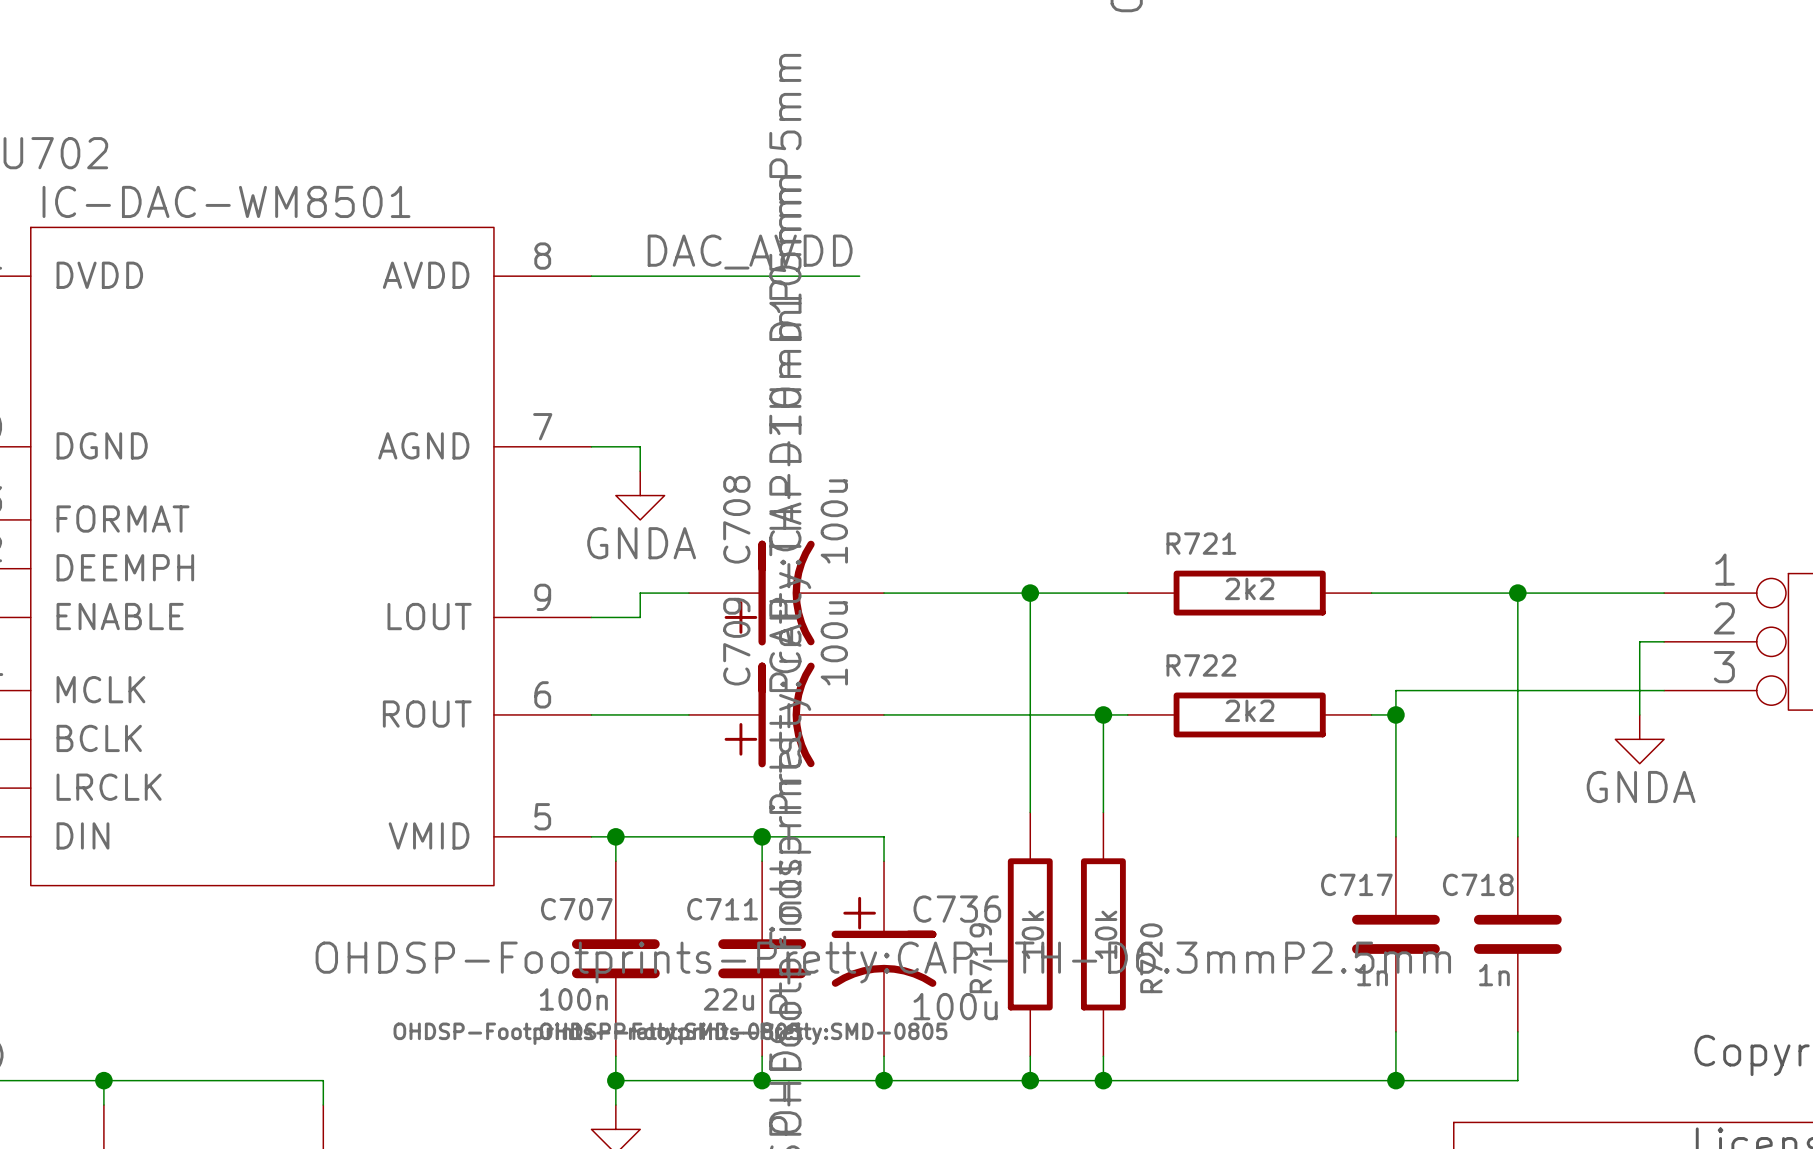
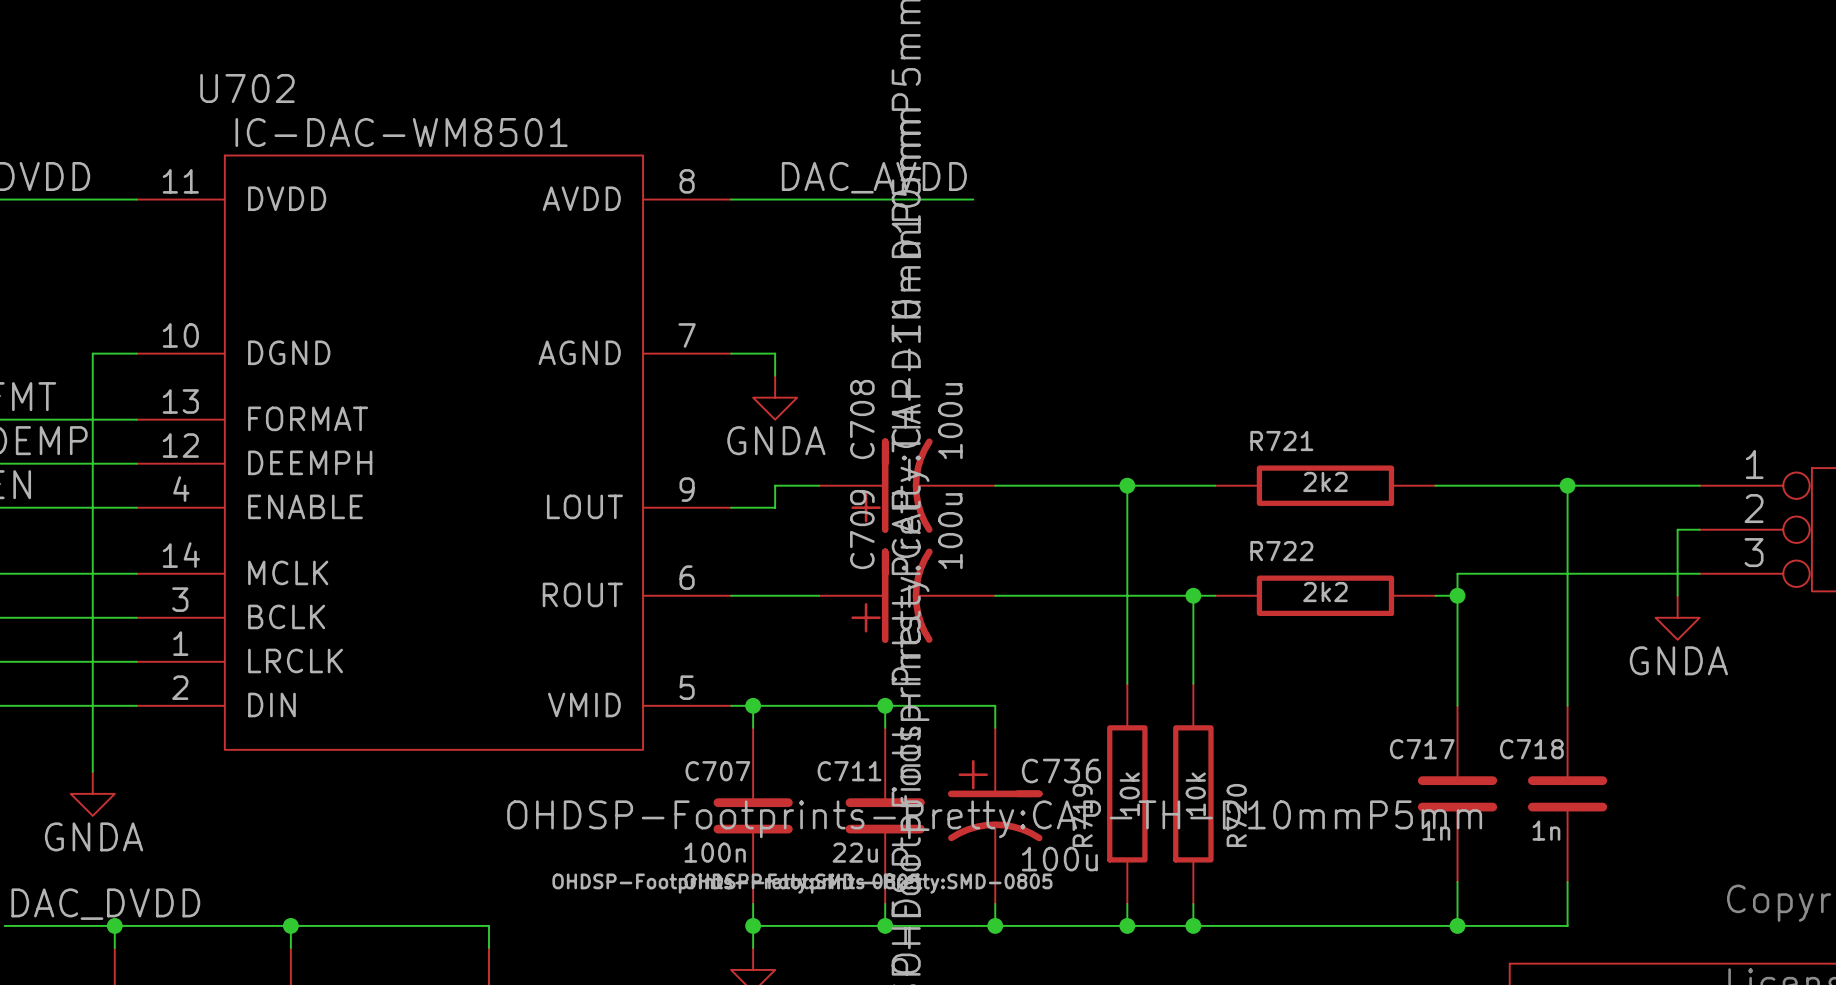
C736 text: OHDSP-Footprints-Pretty:CAP-TH-D6.3mmP2.5mm (883, 962) -> OHDSP-Footprints-Pretty:CAP-TH-D10mmP5mm (994, 819)

